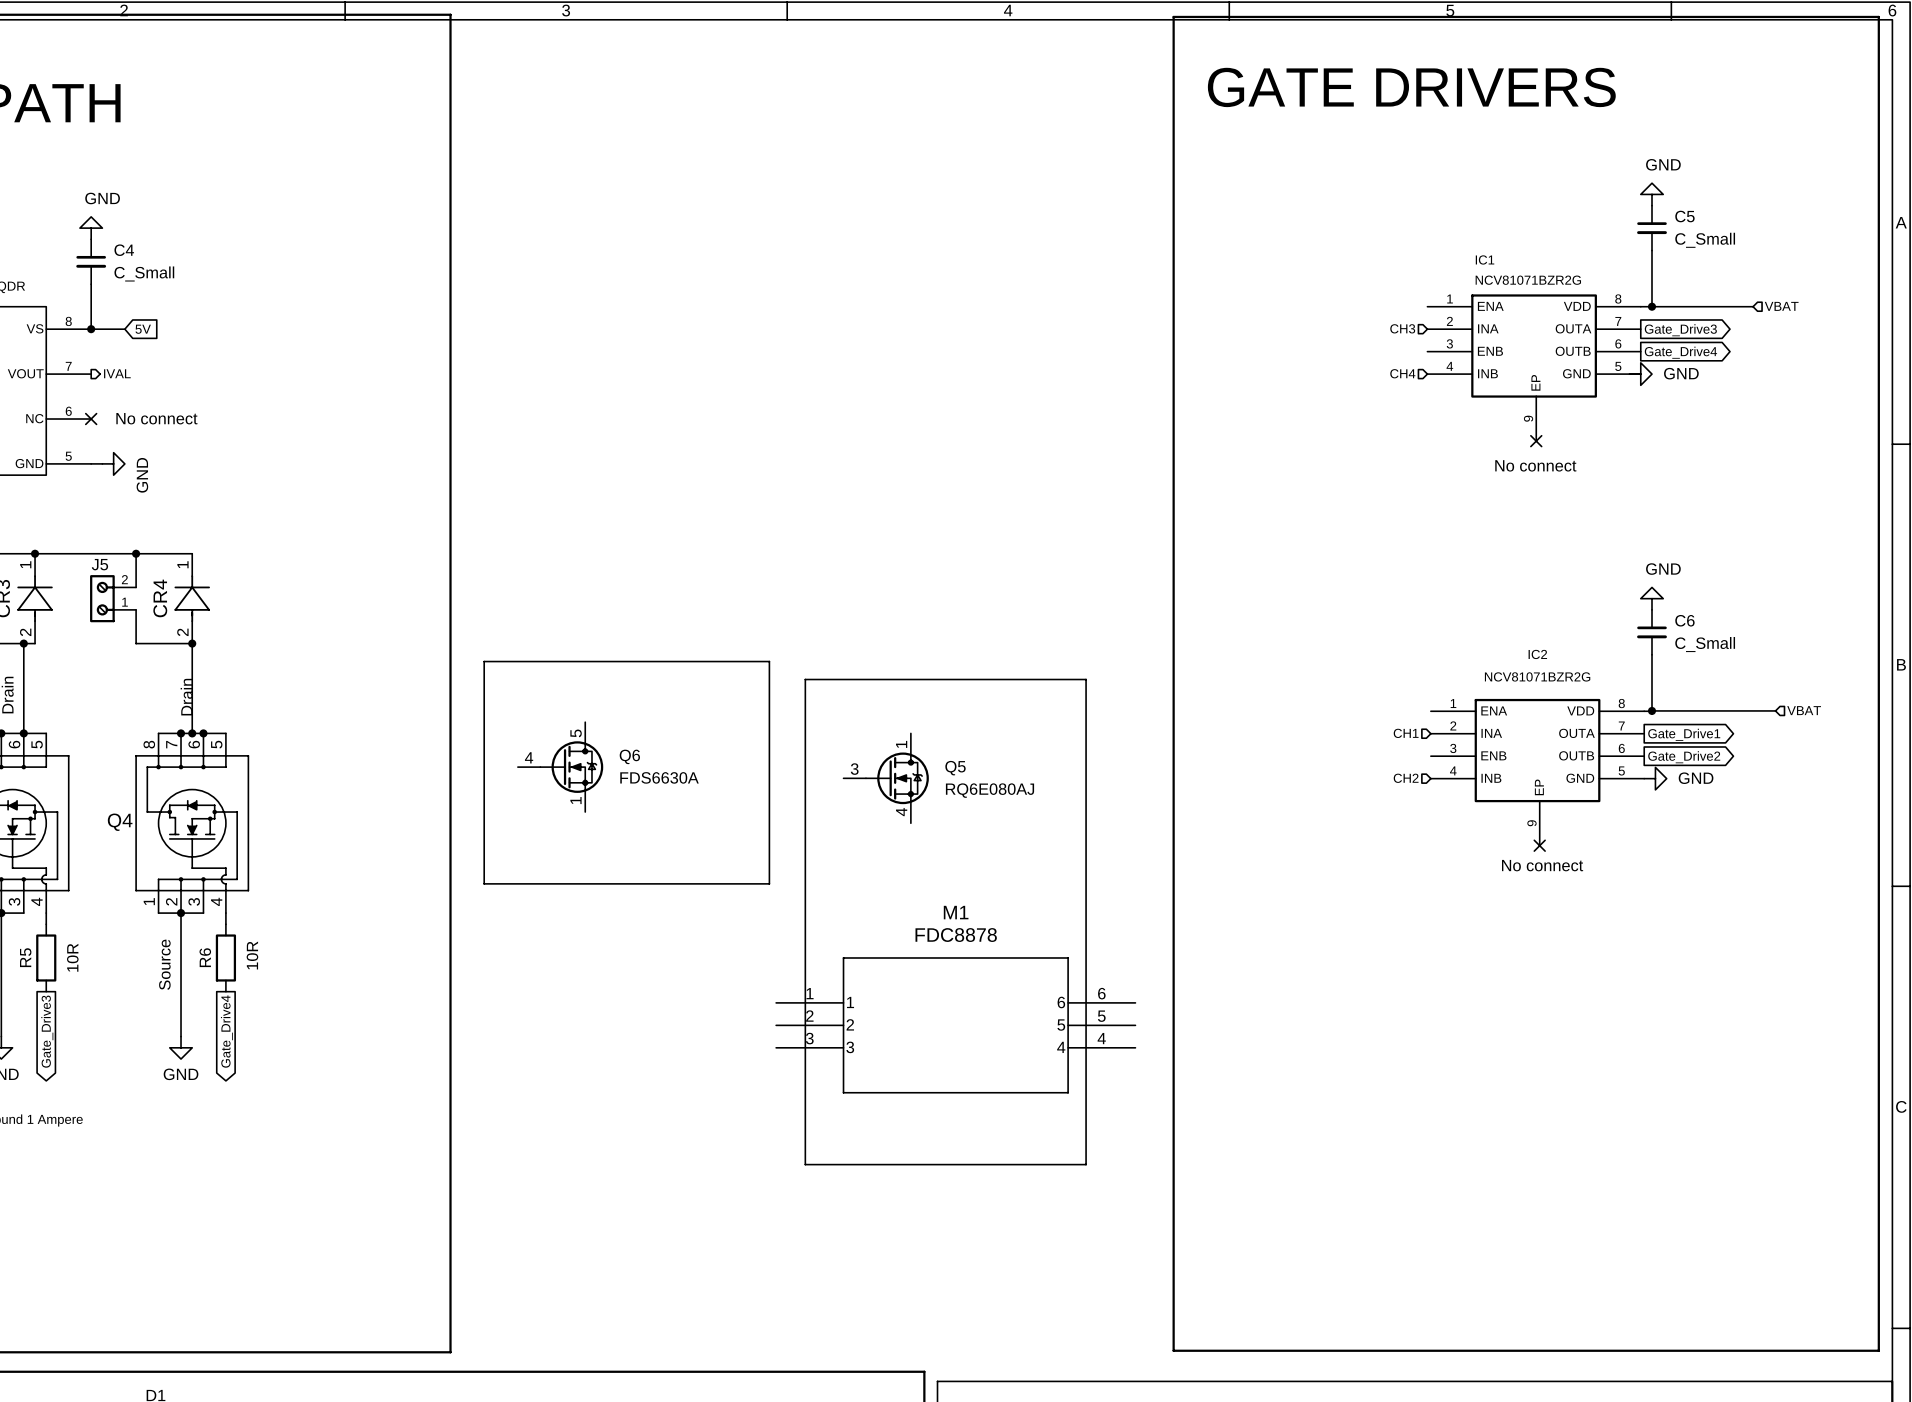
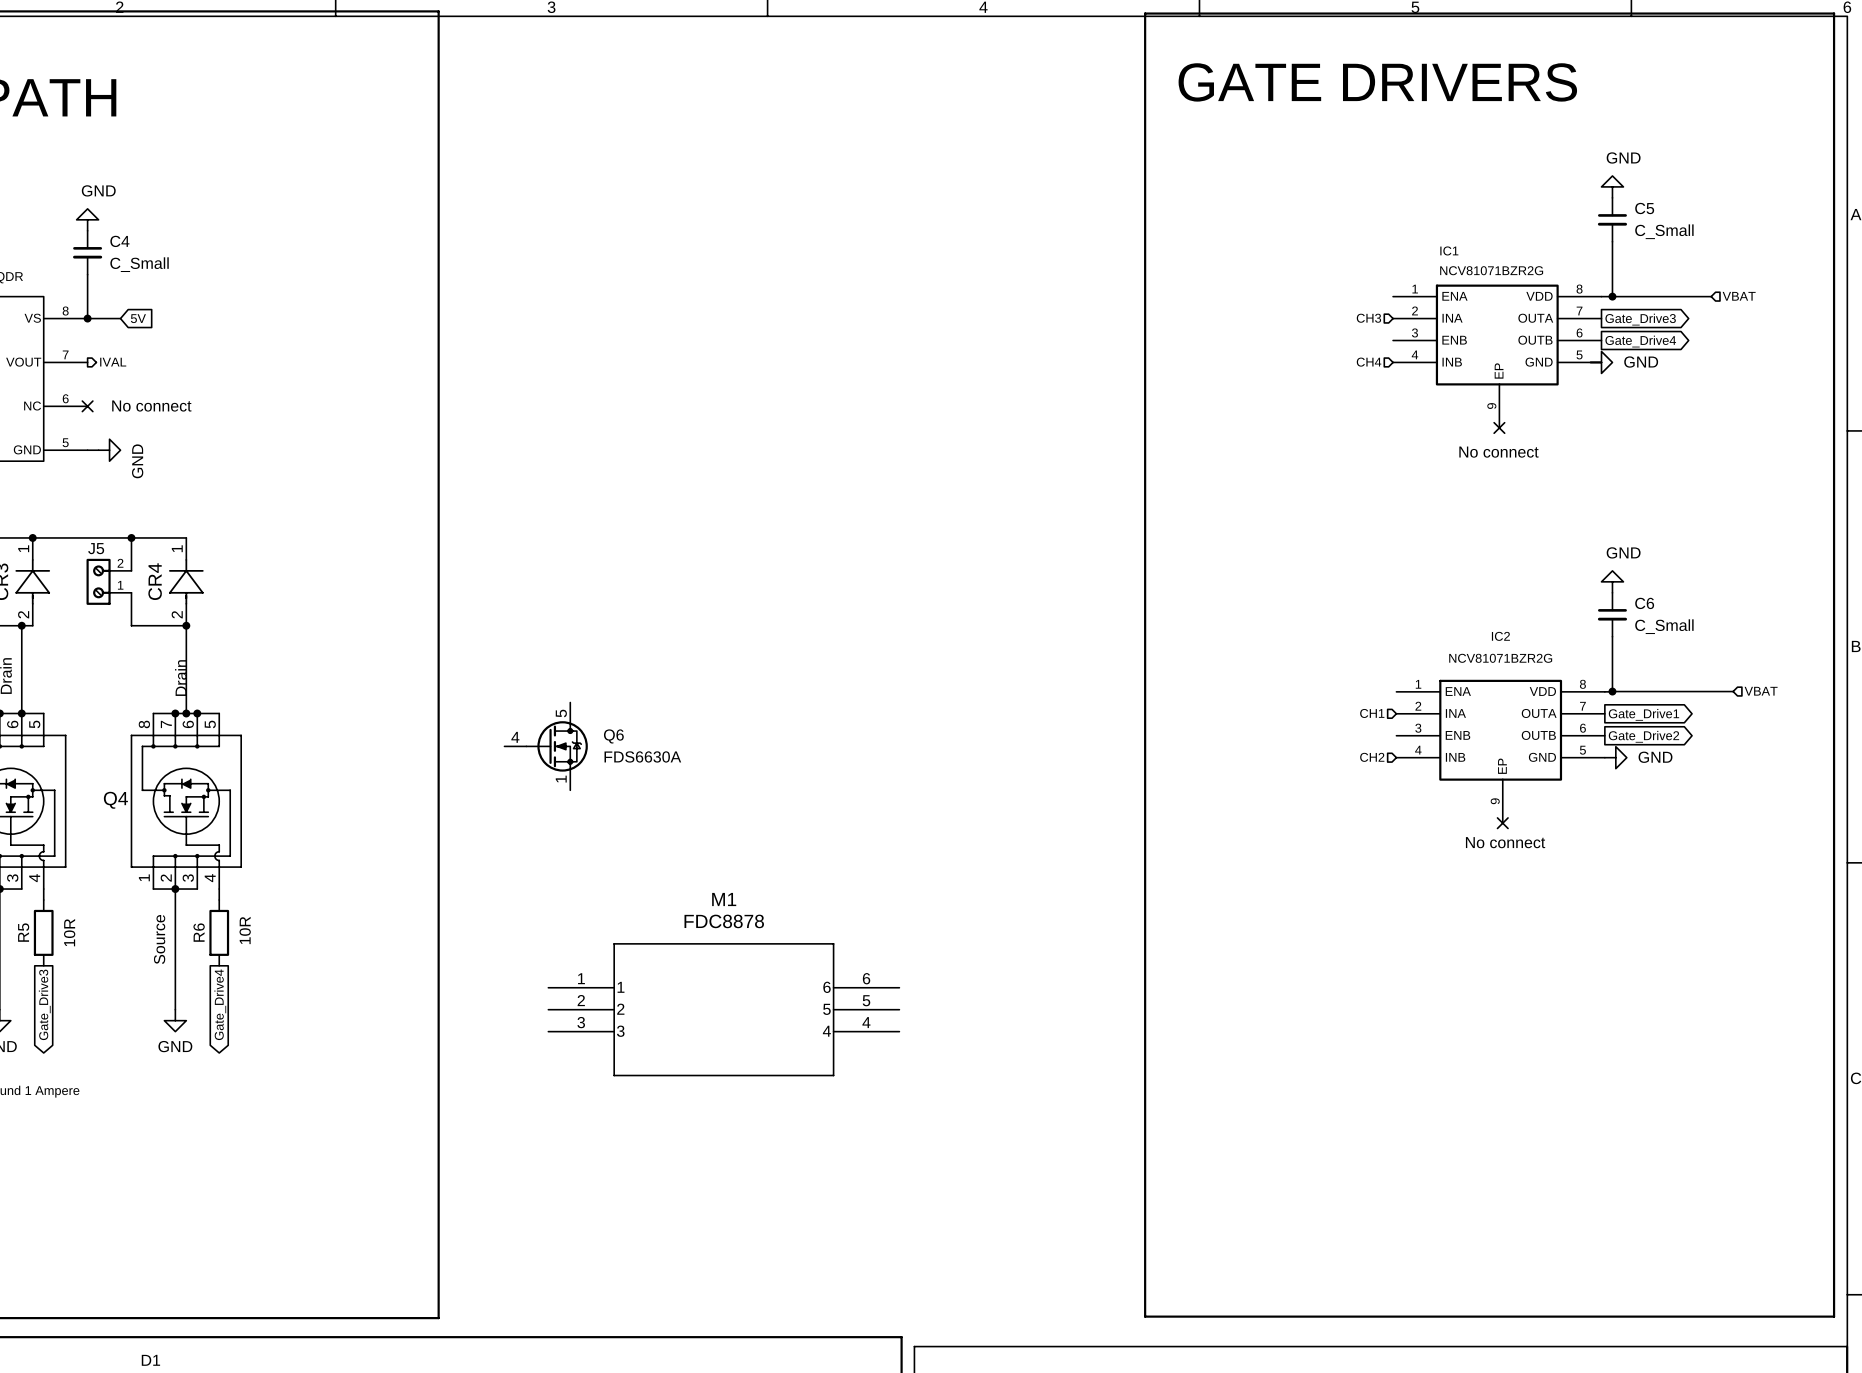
line: (484, 661) (769, 661) (769, 883) (484, 883) (484, 661) -> none
line: (805, 679) (1086, 679) (1086, 1164) (805, 1164) (805, 679) -> none
Q5: RQ6E080AJ (886, 778) -> none
M1 position: (955, 1025) -> (723, 1009)

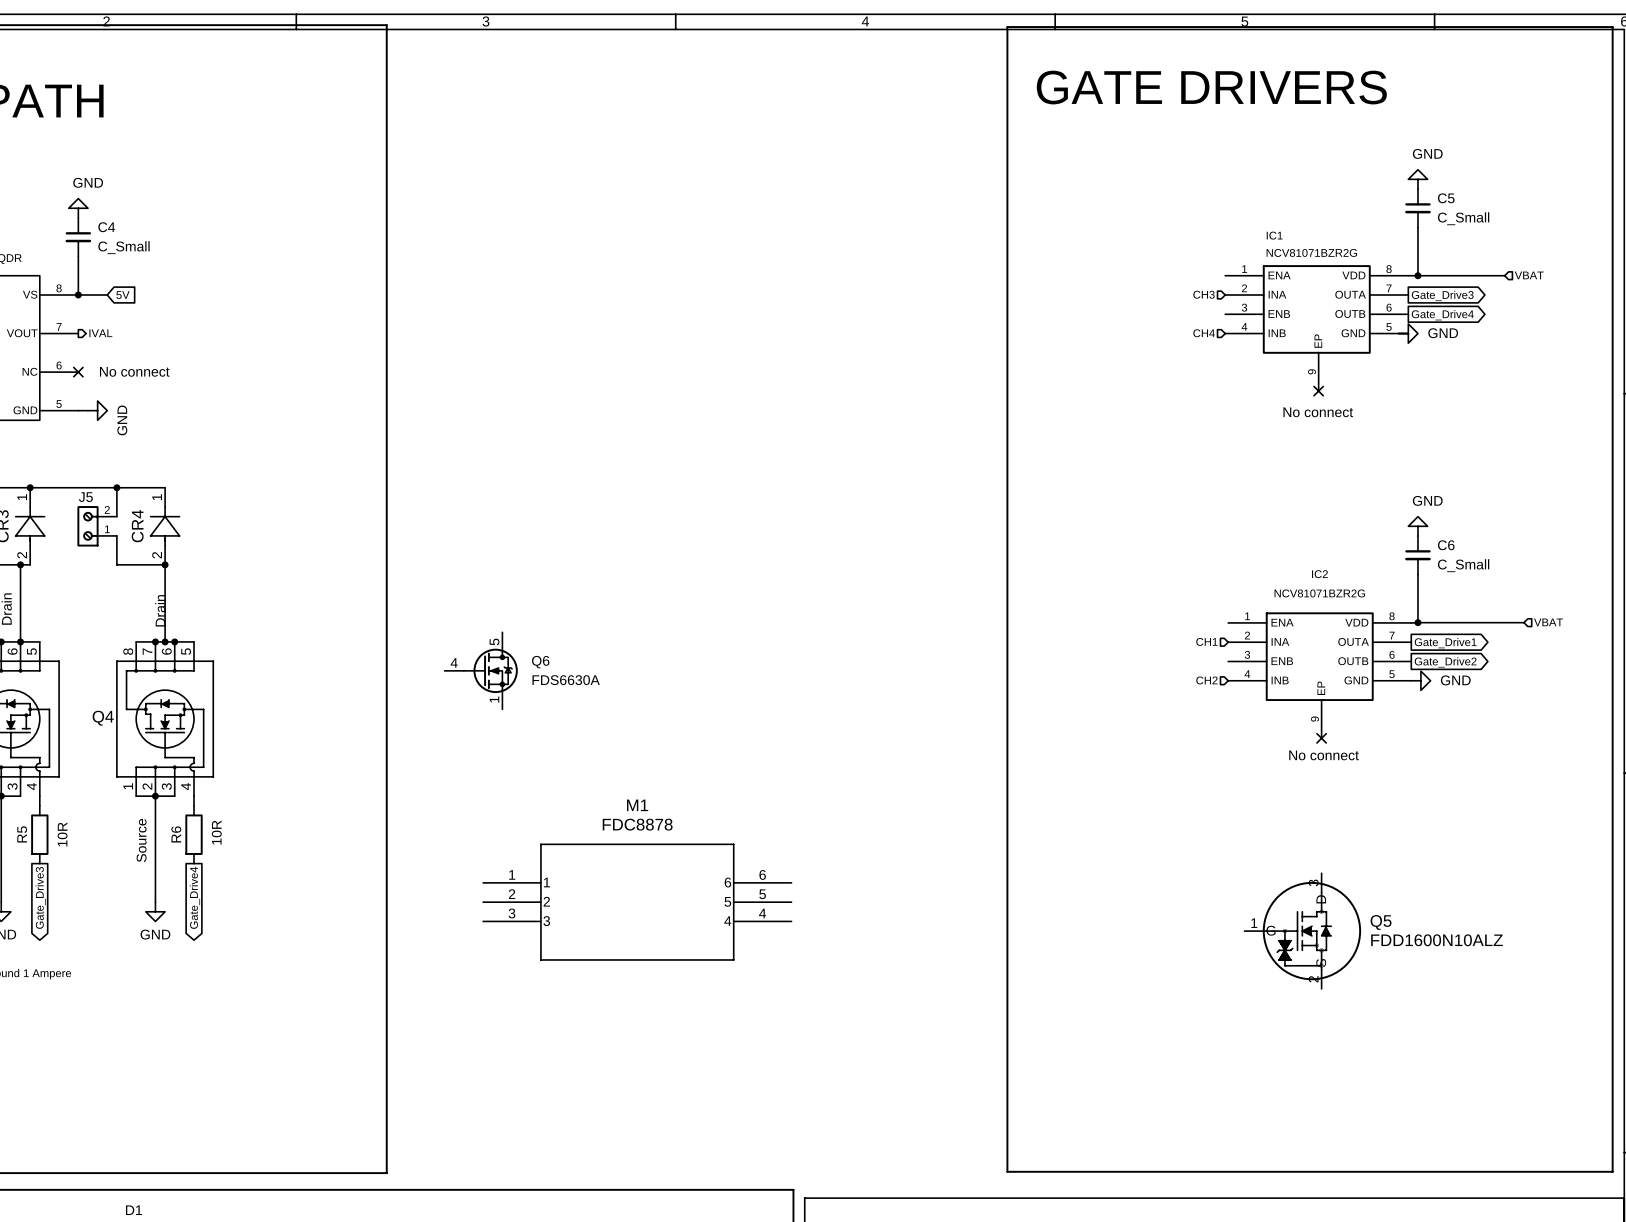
Q5: none -> FDD1600N10ALZ (1302, 931)

